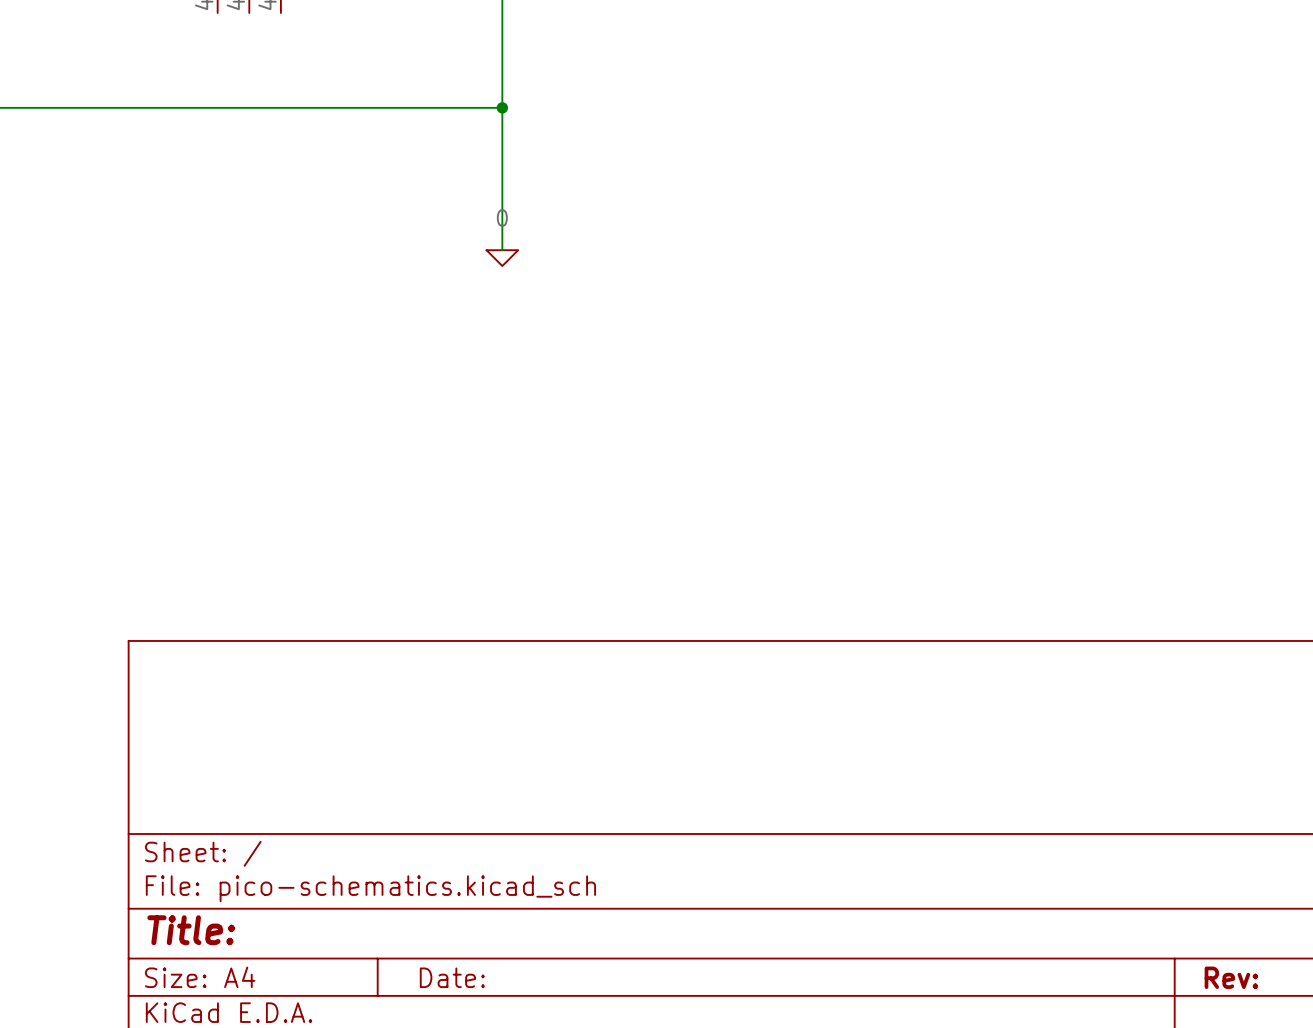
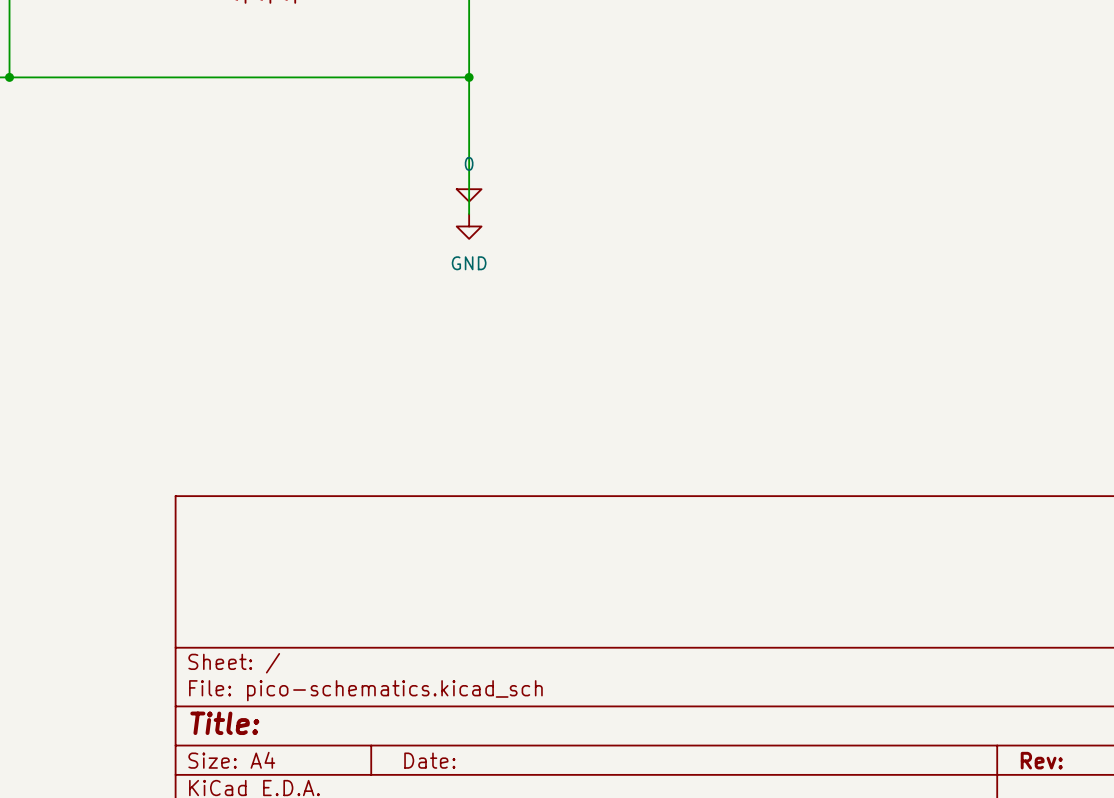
wire: none -> (469, 189) (469, 214)
power symbol: none -> GND (469, 226)

